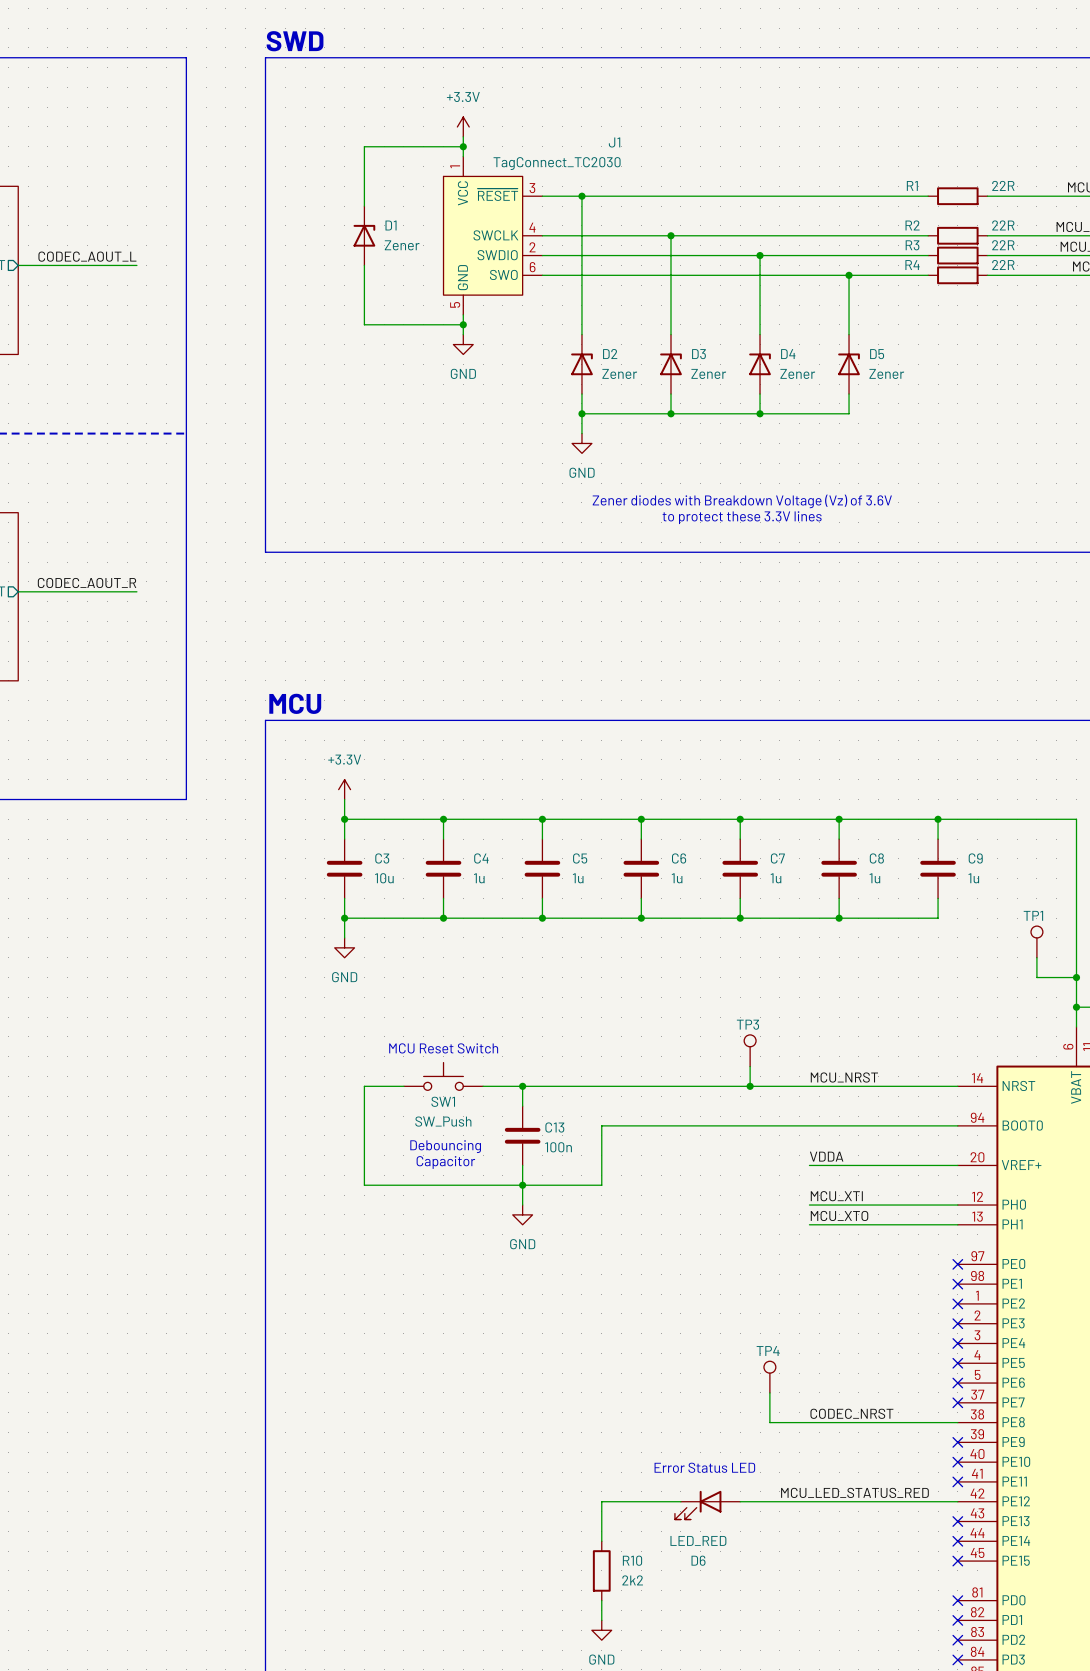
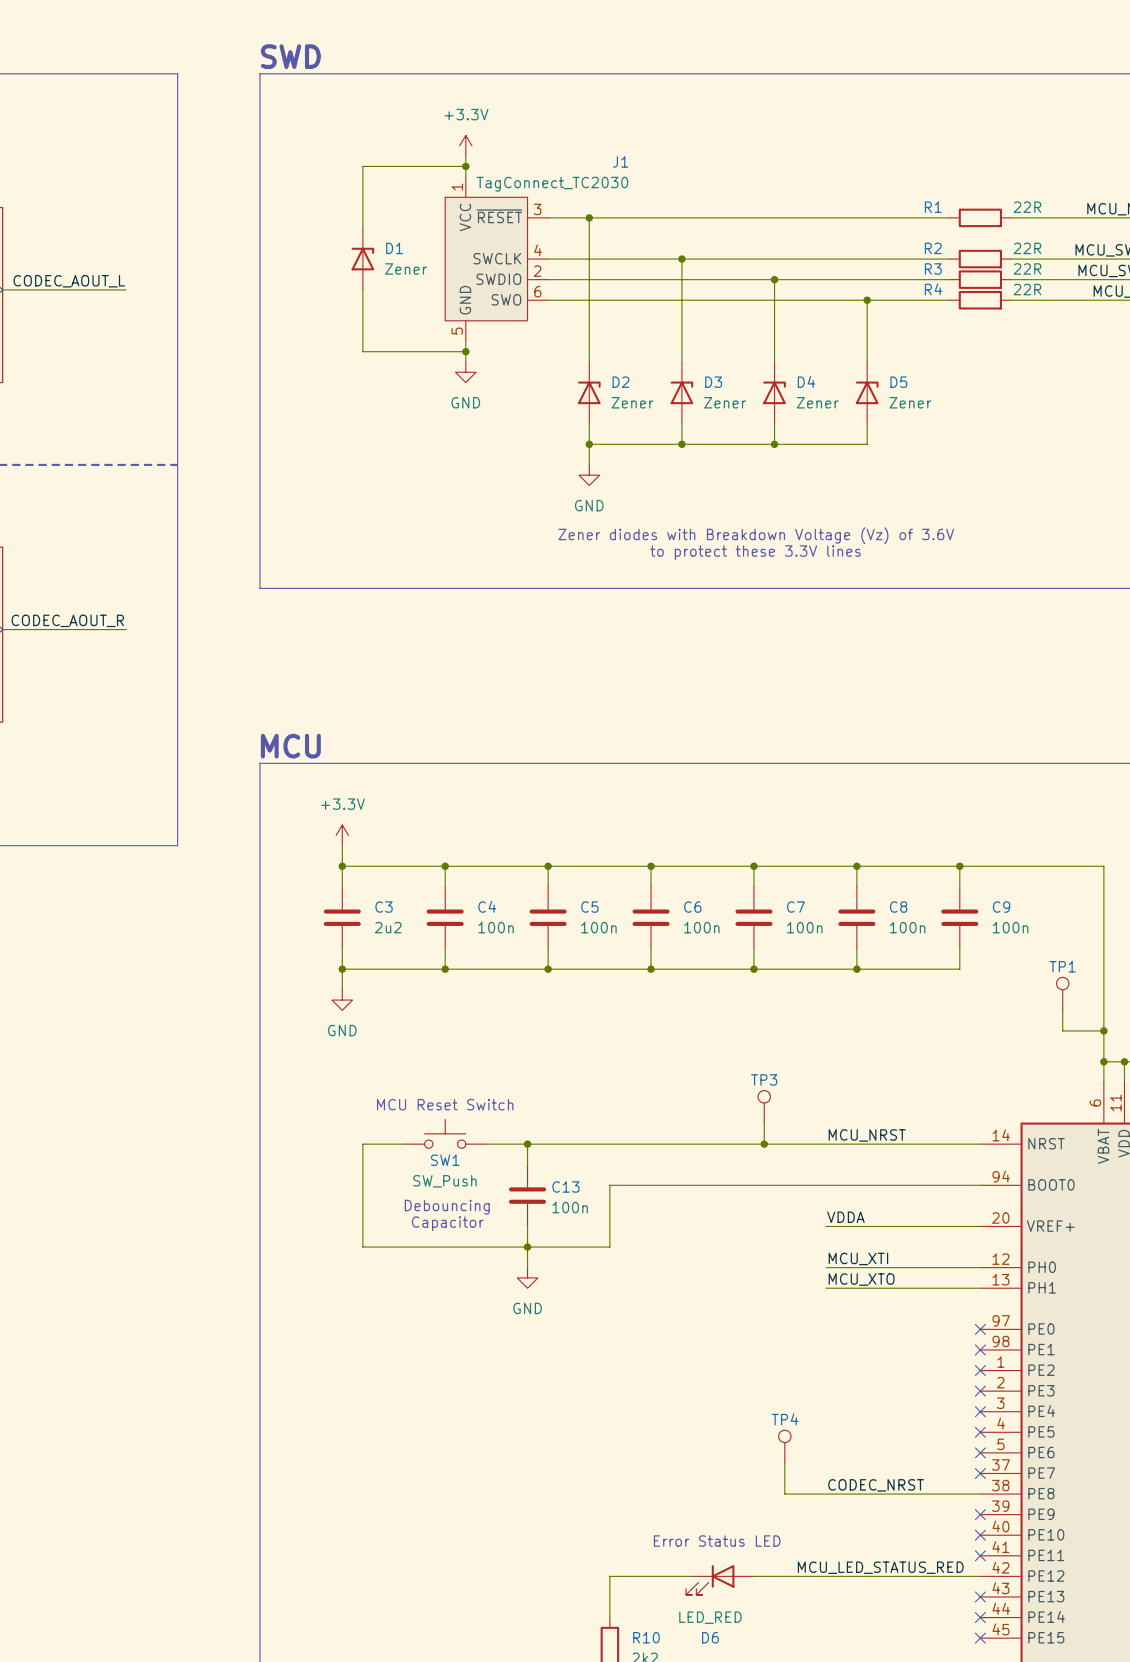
C3 value: 10u (384, 878) -> 2u2 (388, 927)
C4 value: 1u (479, 878) -> 100n (496, 927)
C5 value: 1u (578, 878) -> 100n (598, 927)
C6 value: 1u (677, 878) -> 100n (701, 927)
C7 value: 1u (776, 878) -> 100n (804, 927)
C8 value: 1u (874, 878) -> 100n (907, 927)
C9 value: 1u (973, 878) -> 100n (1010, 927)

